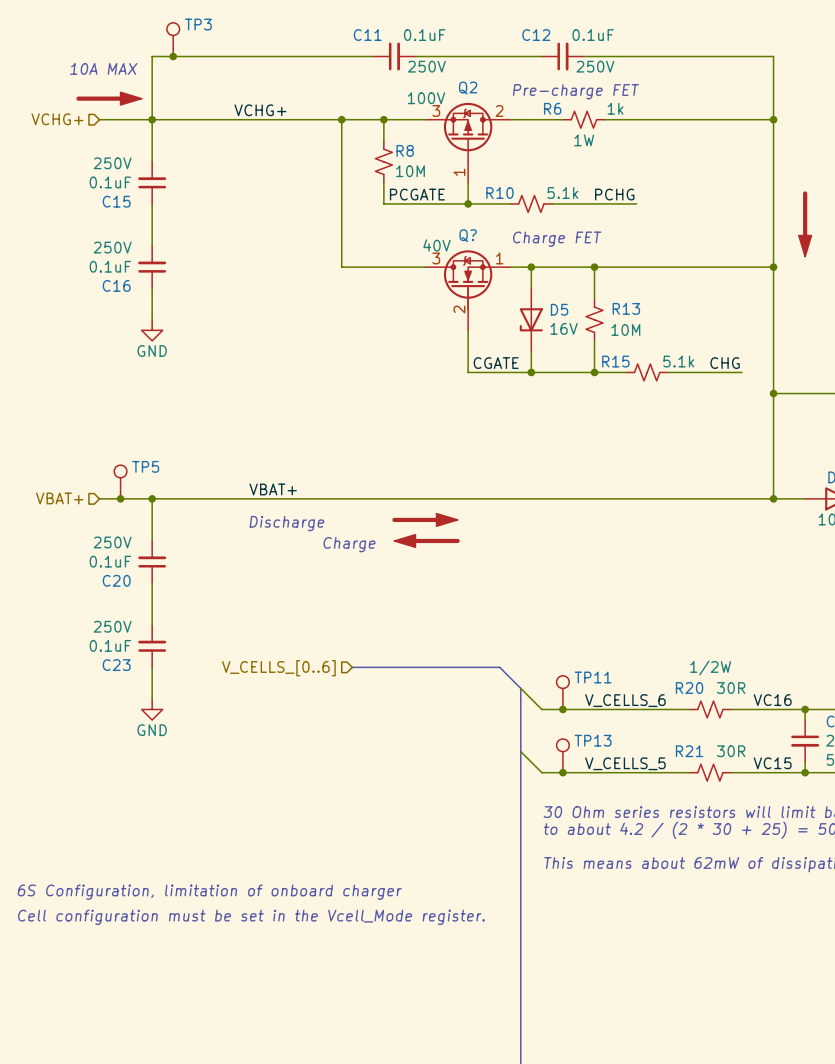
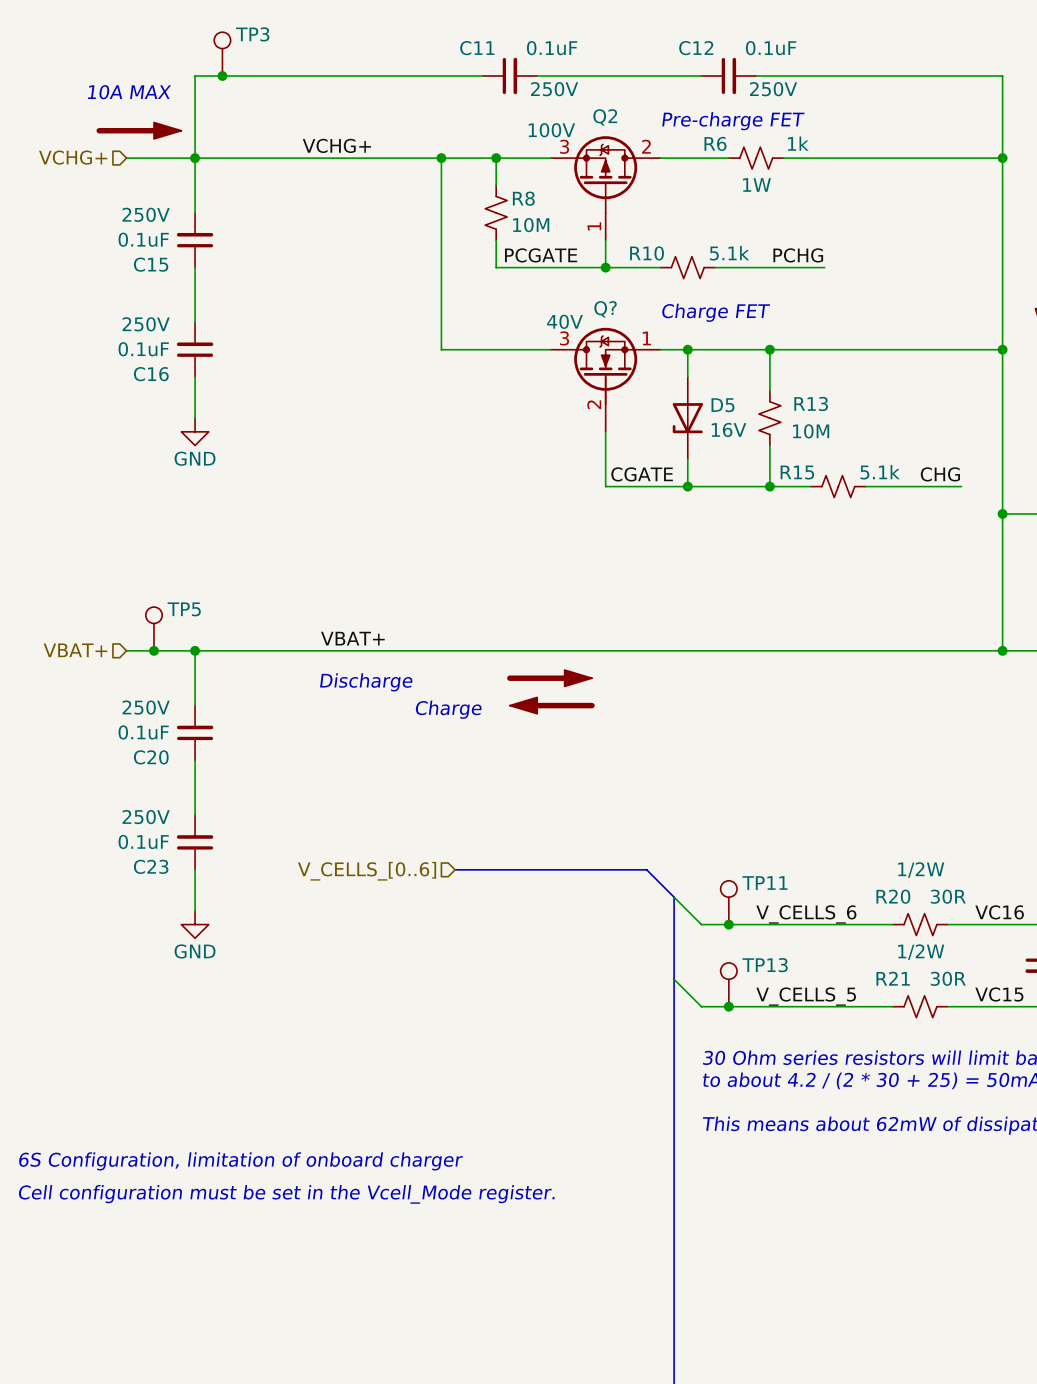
R21 text: none -> 1/2W (921, 952)

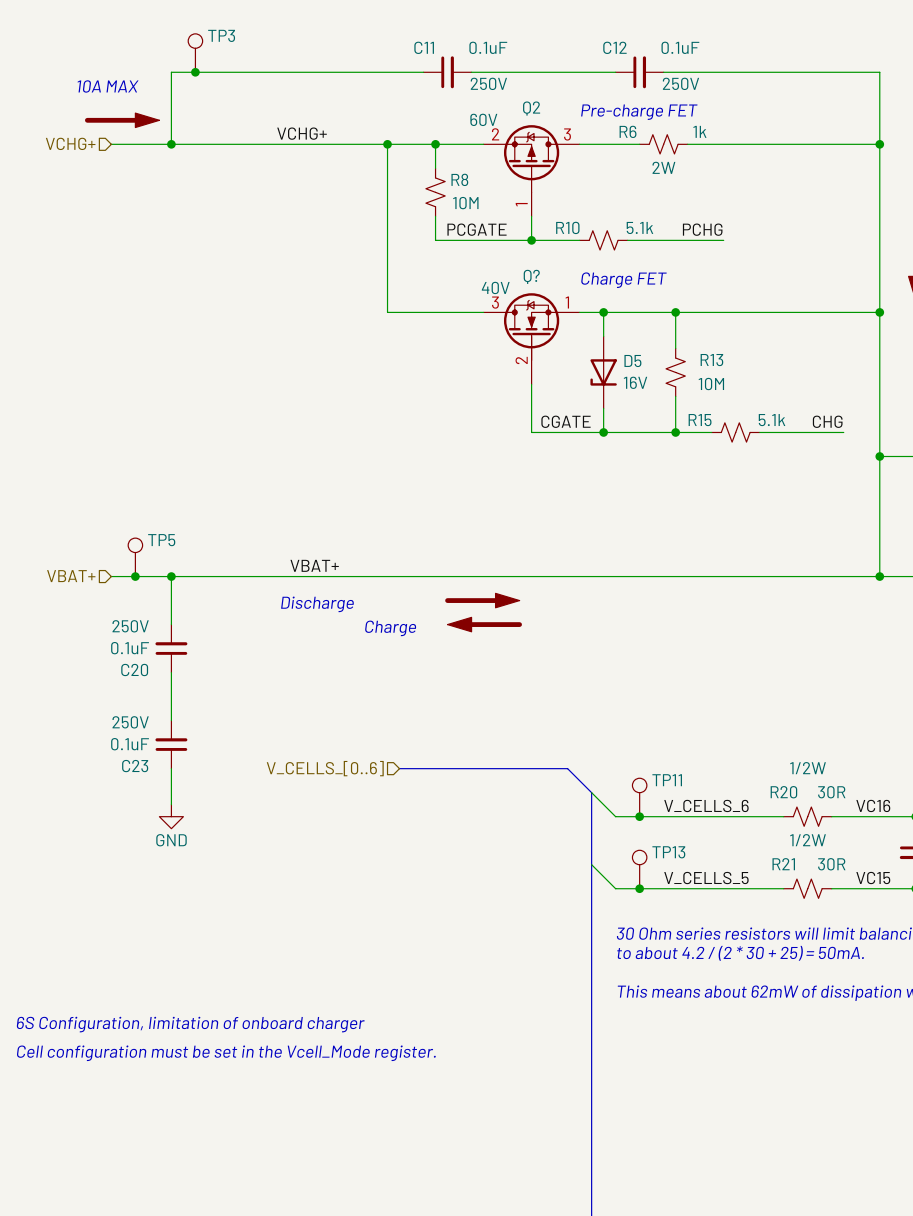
Q2 text: 100V (551, 130) -> 60V (483, 119)
Q2 pin number: 3 (564, 146) -> 2 (495, 134)
Q2 pin number: 2 (646, 146) -> 3 (567, 134)
wire: (195, 158) (195, 212) -> none
R6 text: 1W (756, 184) -> 2W (663, 167)
C15: 0.1uF (195, 240) -> none
wire: (195, 267) (195, 322) -> none
C16: 0.1uF (195, 349) -> none
wire: (195, 377) (195, 418) -> none
power symbol: GND (195, 431) -> none

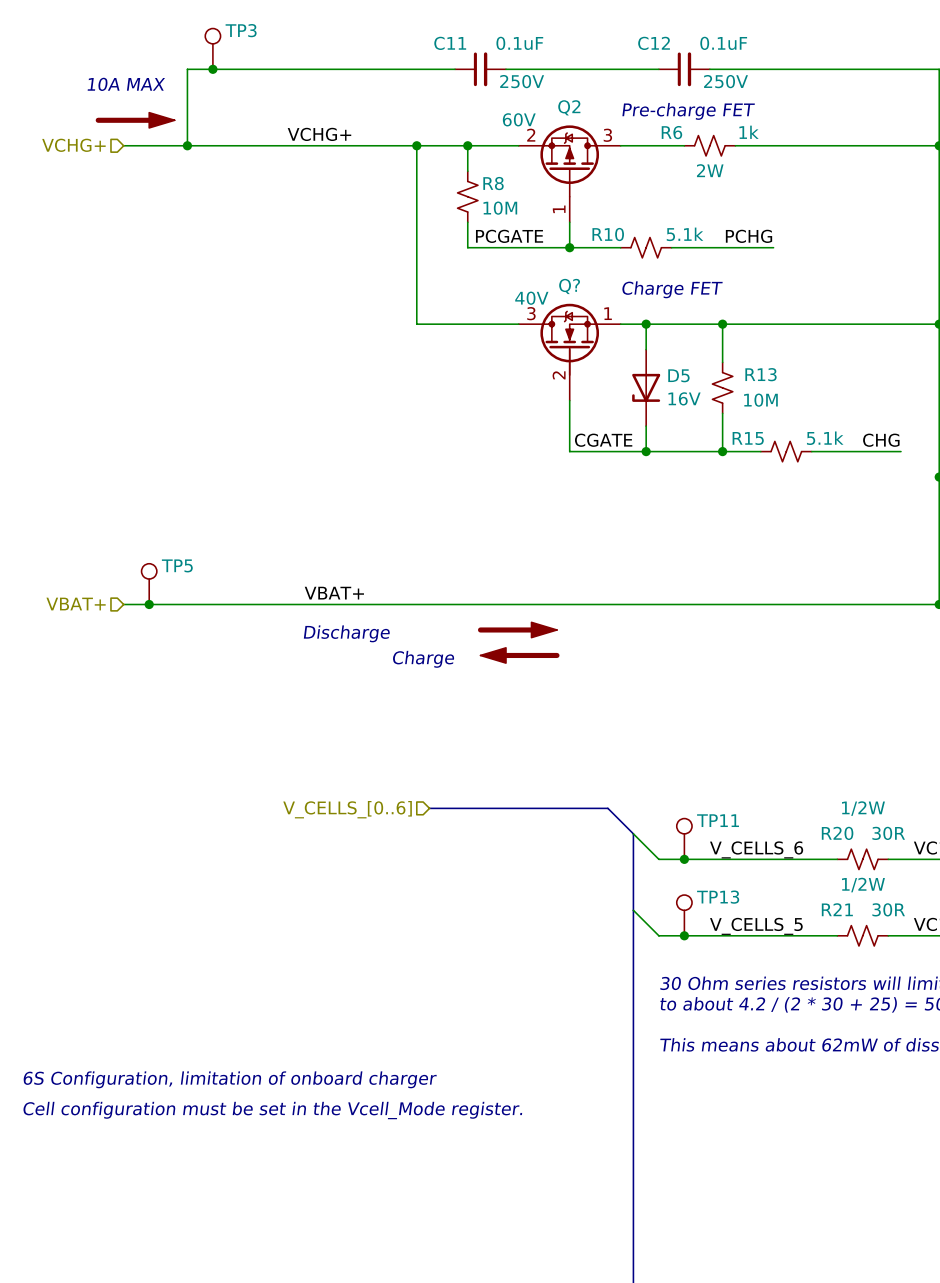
wire: (171, 576) (171, 624) -> none
junction: (171, 576) -> none
C20: 0.1uF (171, 648) -> none
wire: (171, 672) (171, 720) -> none
C23: 0.1uF (171, 744) -> none
wire: (171, 768) (171, 804) -> none
power symbol: GND (171, 816) -> none

